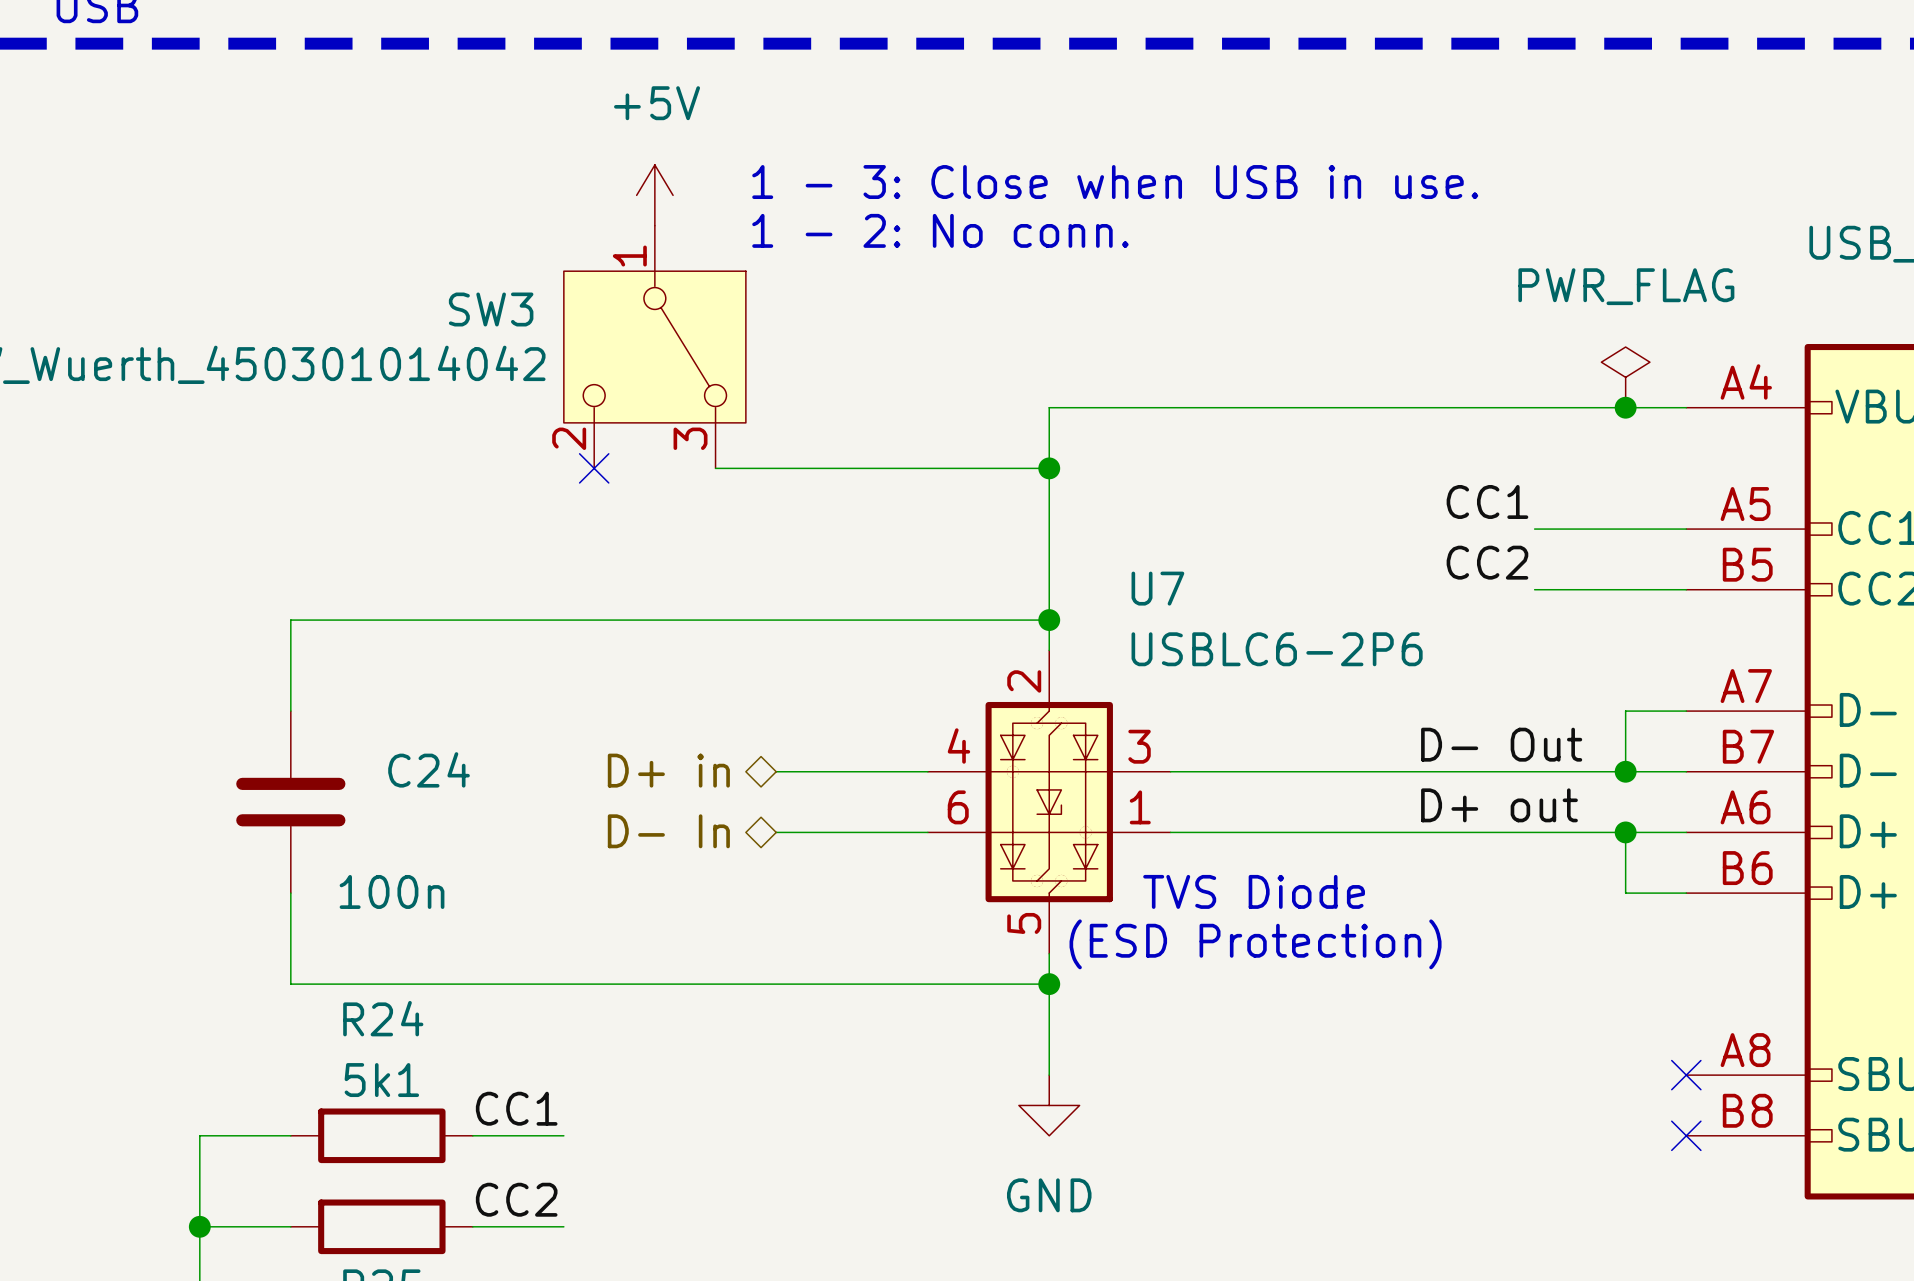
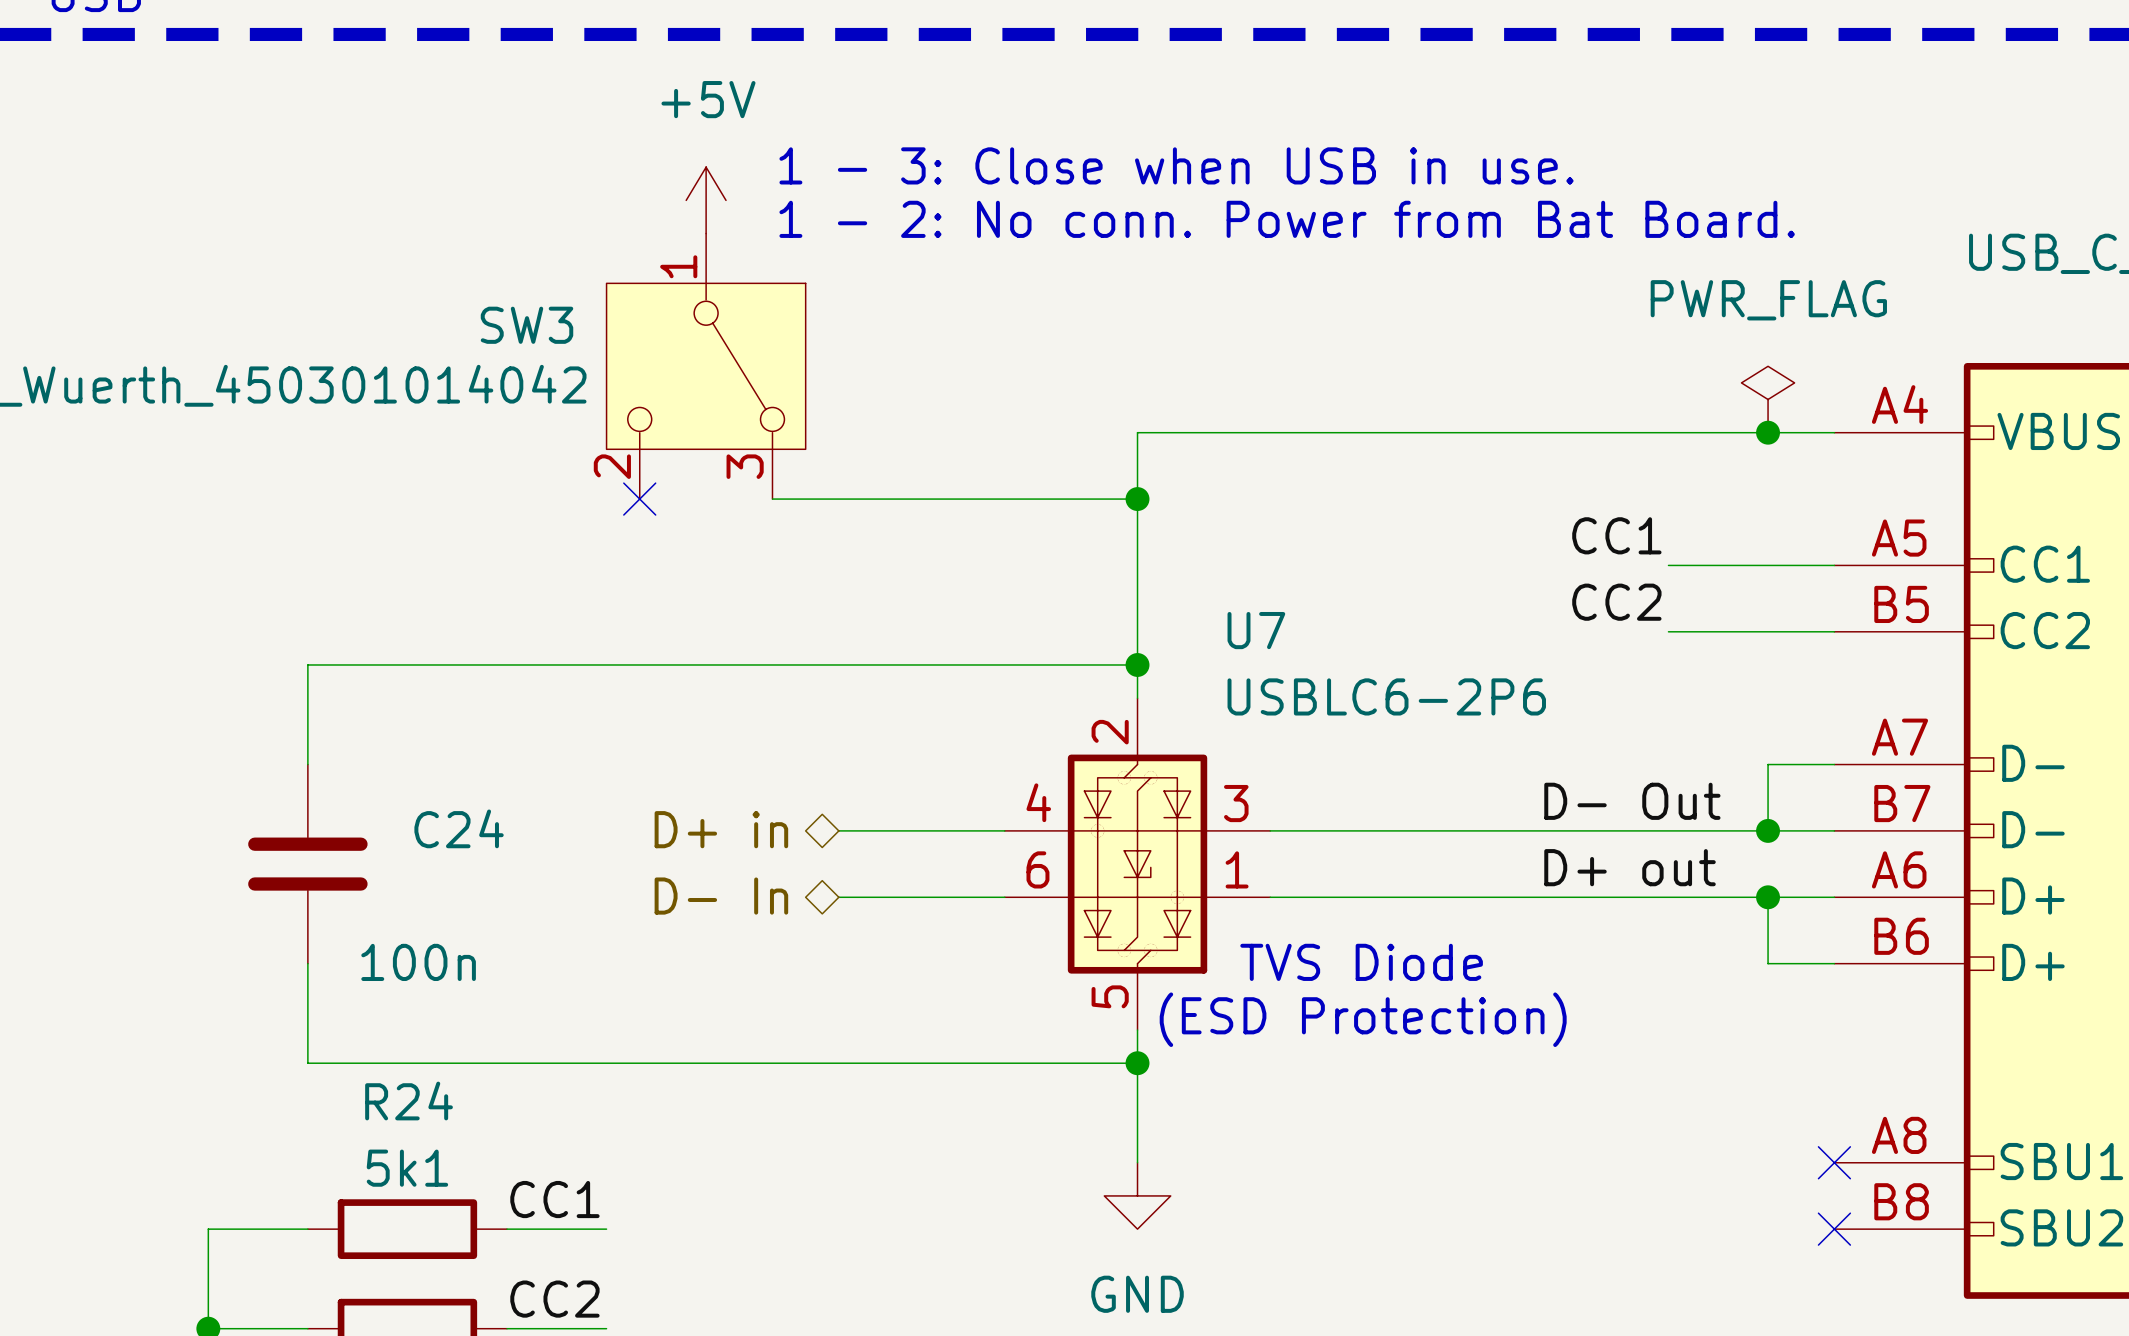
text position: 1 - 3: Close when USB in use. (1115, 182) -> 1 - 3: Close when USB in use. (1176, 165)
text: none -> 1 - 2: No conn. Power from Bat Board. (1287, 219)
text: 1 - 2: No conn. (940, 230) -> none

